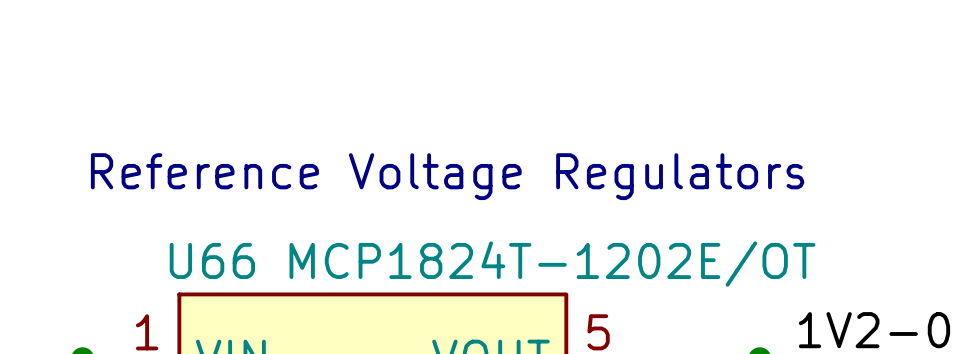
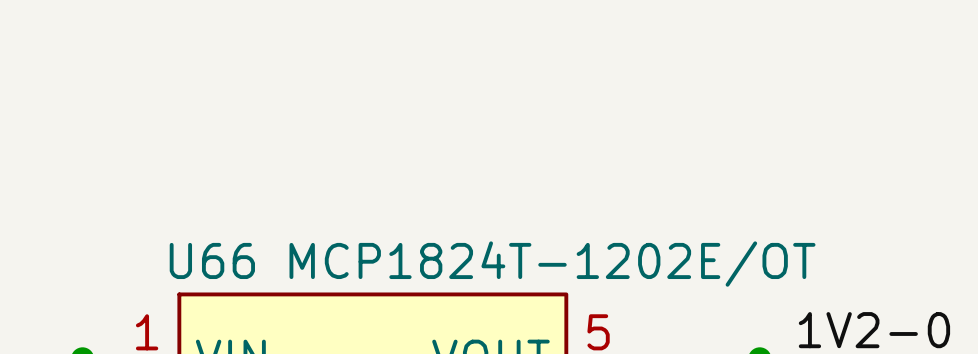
text: Reference Voltage Regulators (447, 176) -> none

